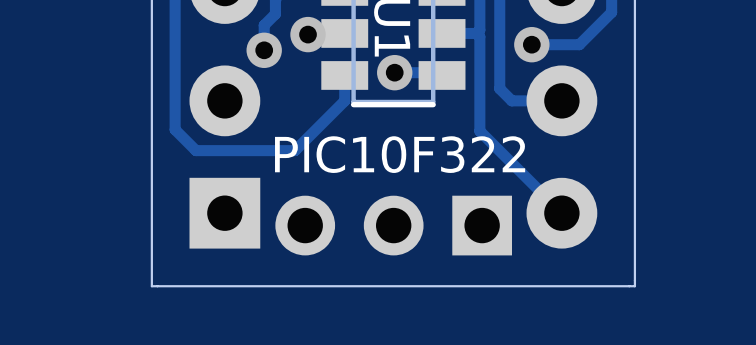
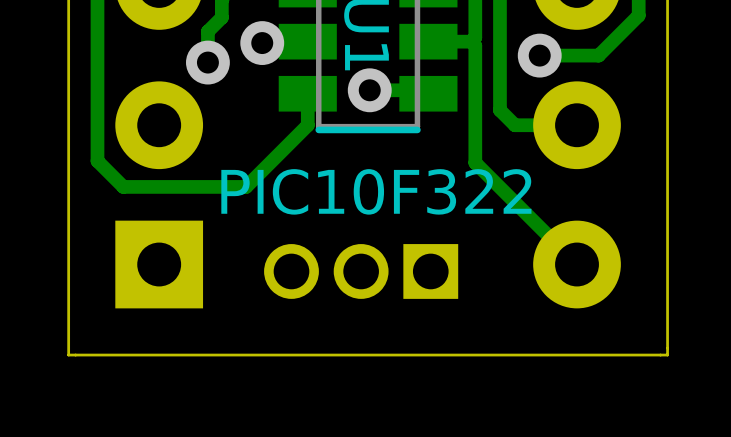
part footprint: [275, 195, 512, 256] -> [264, 244, 459, 299]

